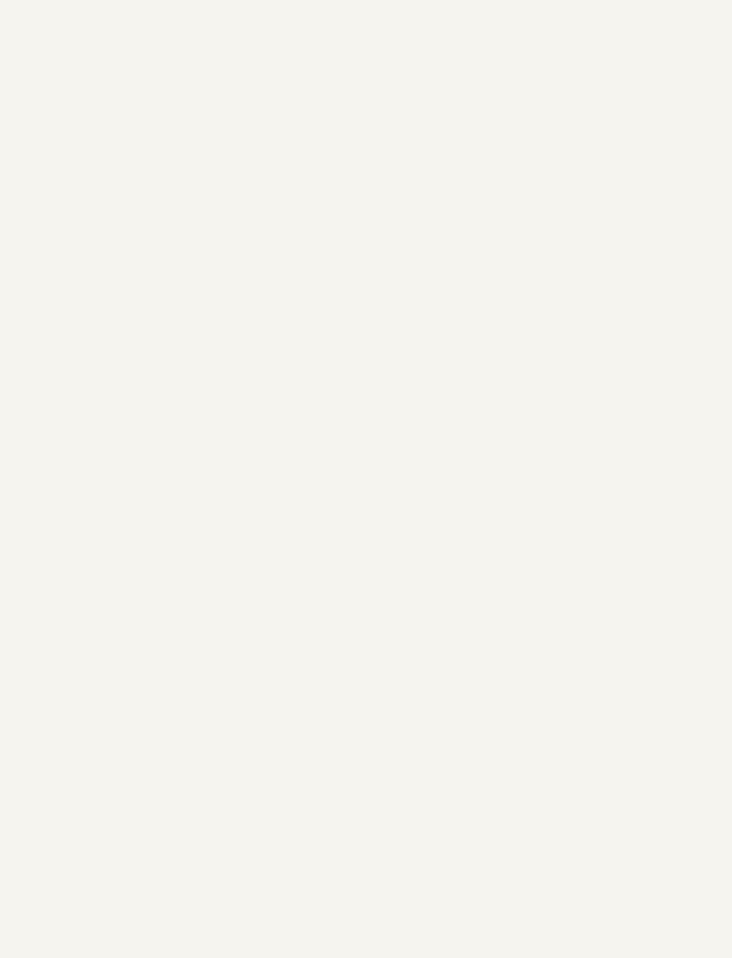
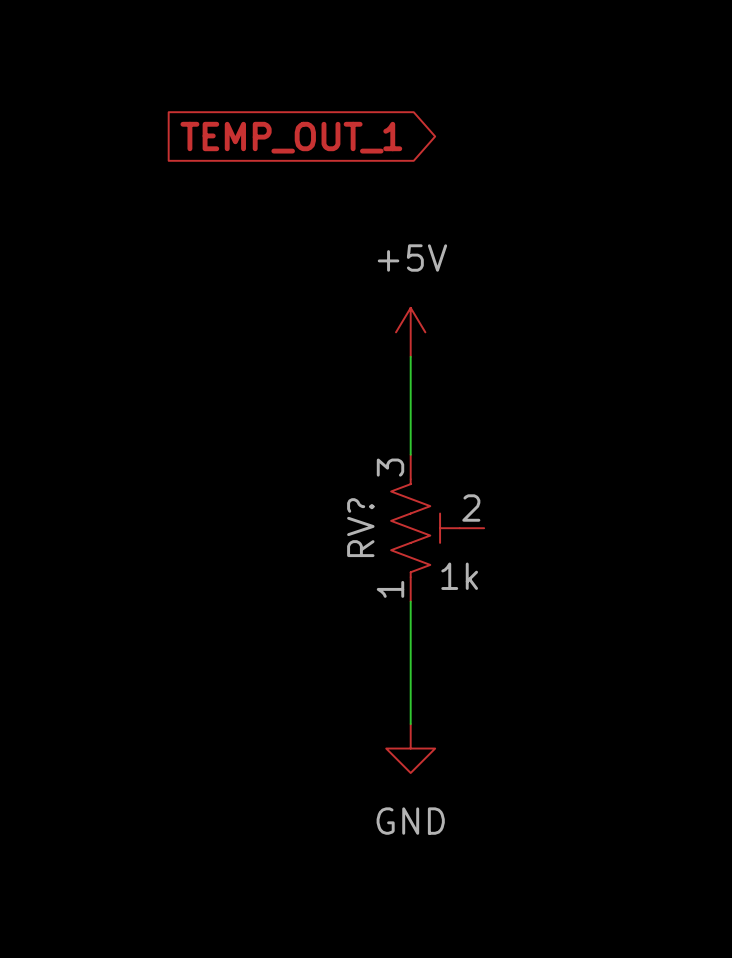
global label: none -> TEMP_OUT_1 (291, 137)
power symbol: none -> +5V (410, 332)
wire: none -> (410, 356) (410, 454)
RV?: none -> 1k (437, 528)
wire: none -> (410, 601) (410, 724)
power symbol: none -> GND (410, 748)

